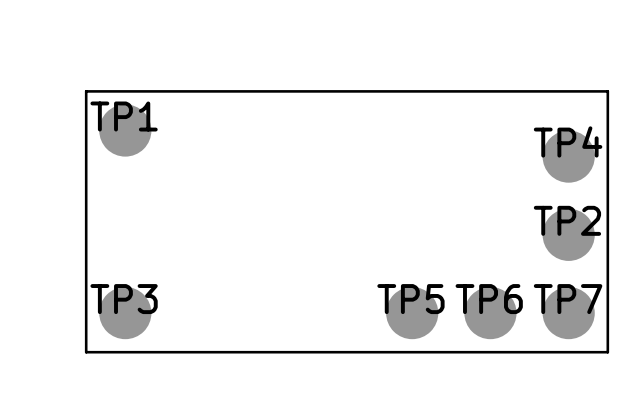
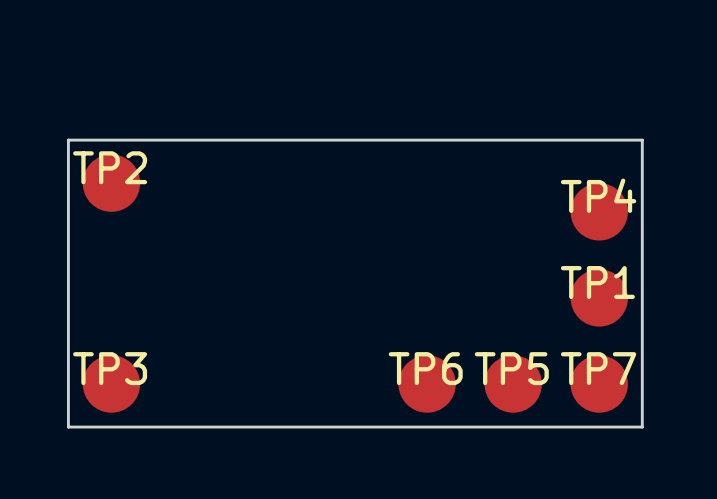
TP1 name: TP1 (124, 116) -> TP2 (110, 167)
TP2 name: TP2 (567, 220) -> TP1 (597, 282)
TP5 name: TP5 (410, 299) -> TP6 (425, 368)
TP6 name: TP6 (489, 299) -> TP5 (511, 368)

